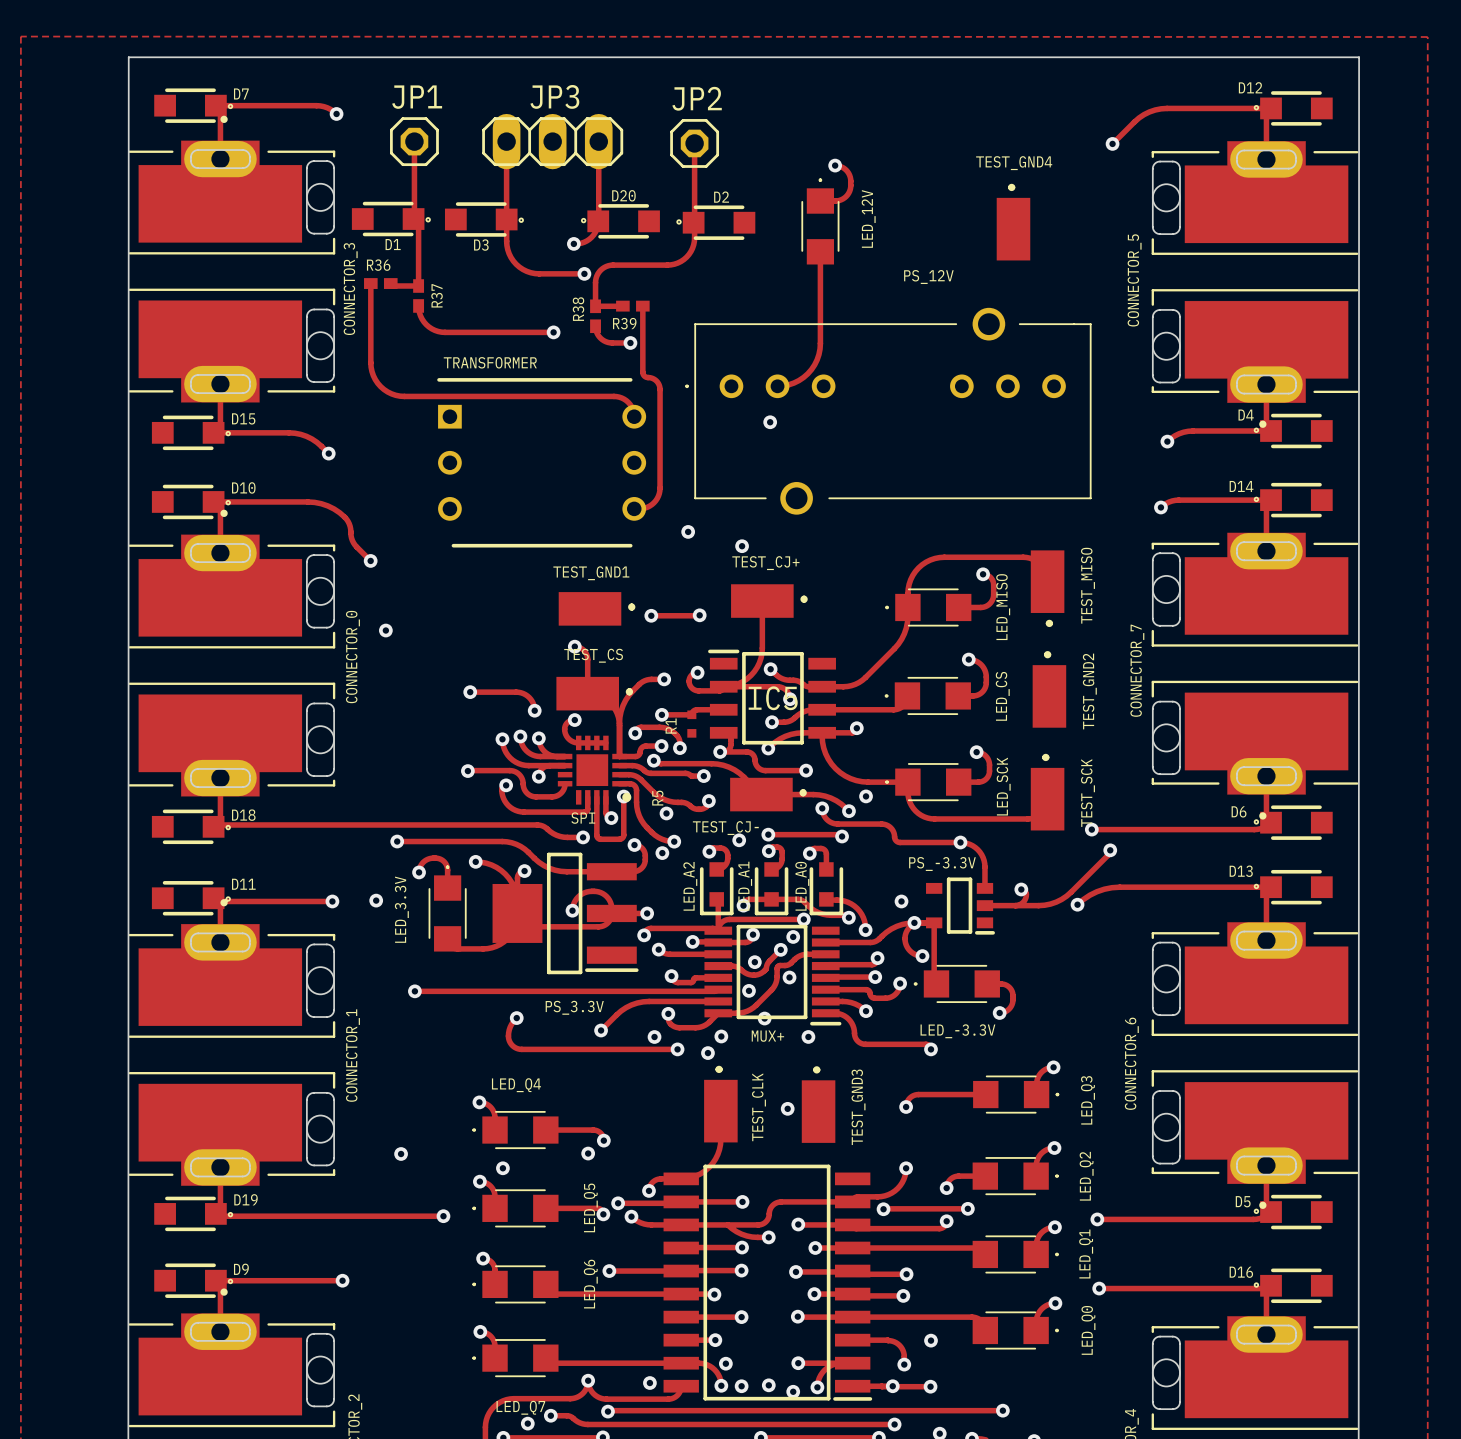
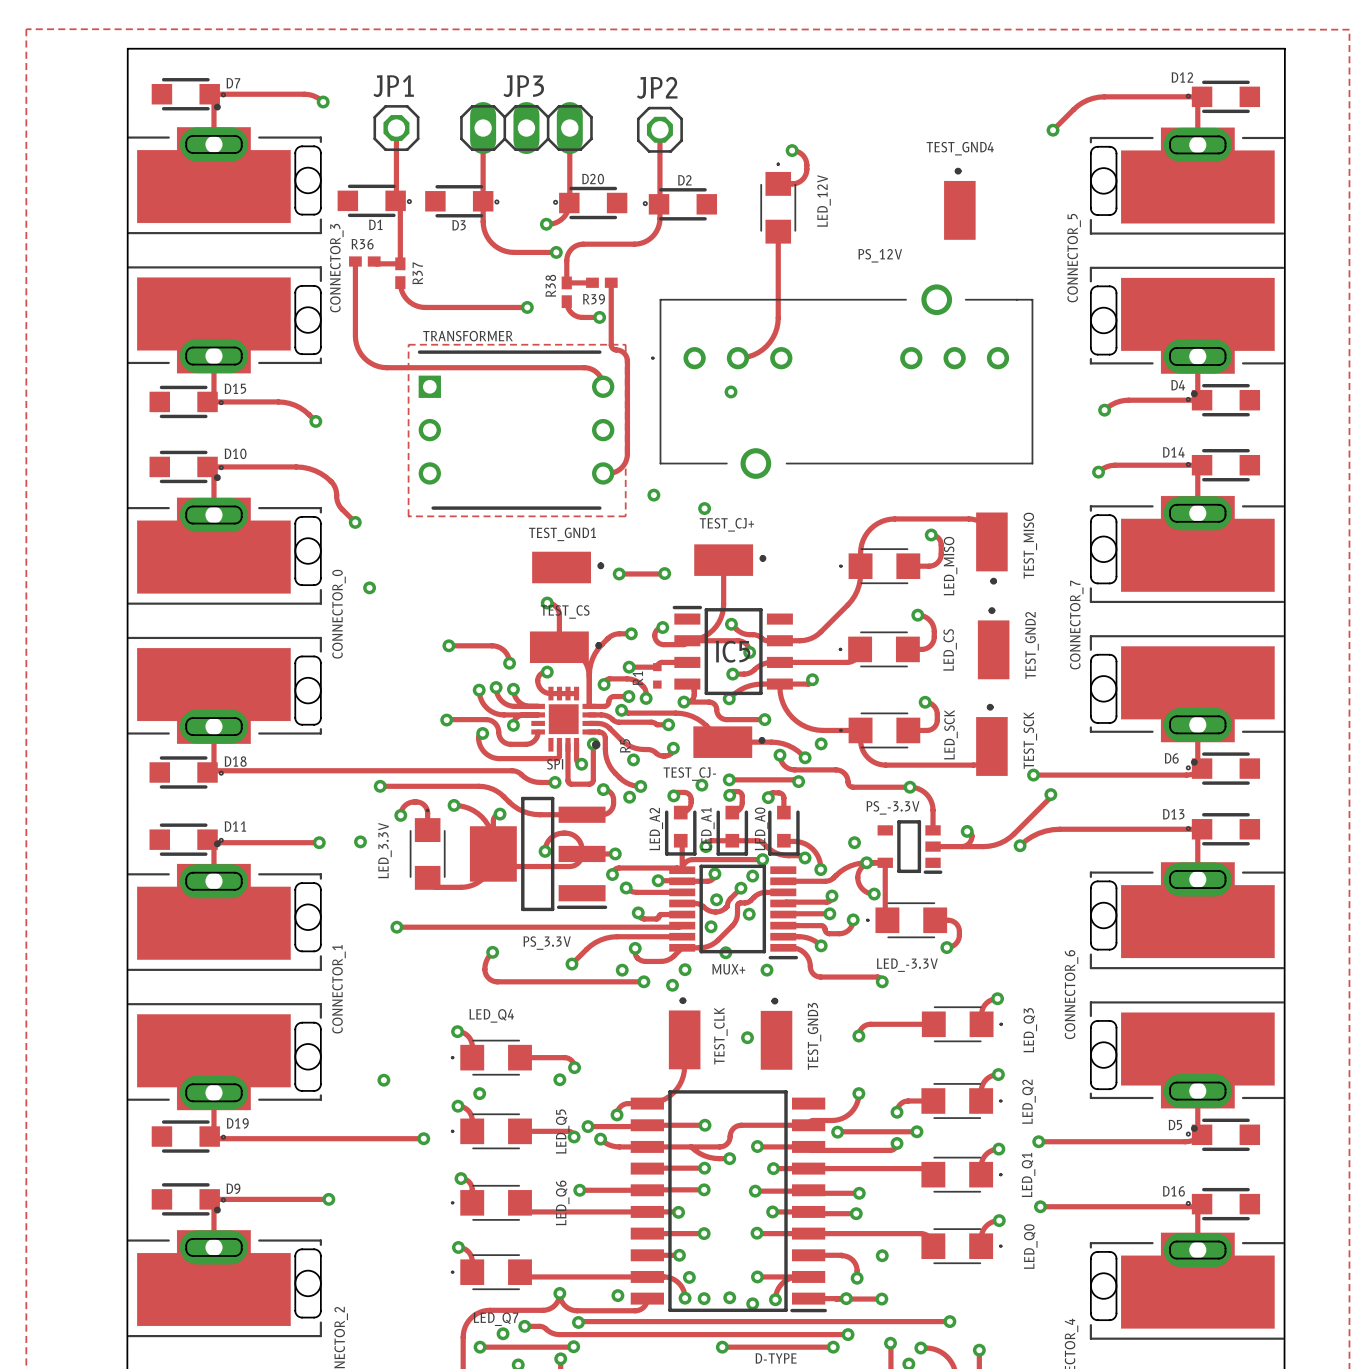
zone outline: none -> (408, 516) (625, 516) (625, 344) (408, 344) (408, 516)

